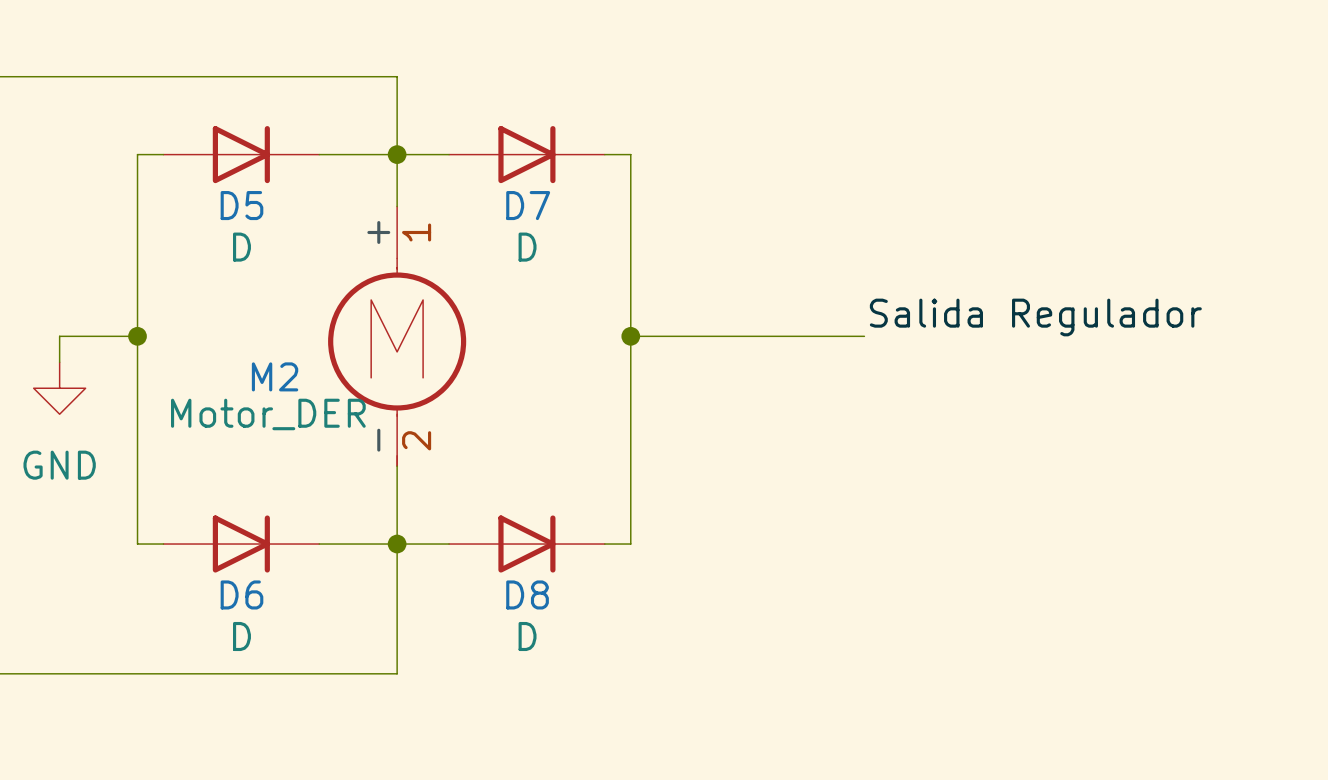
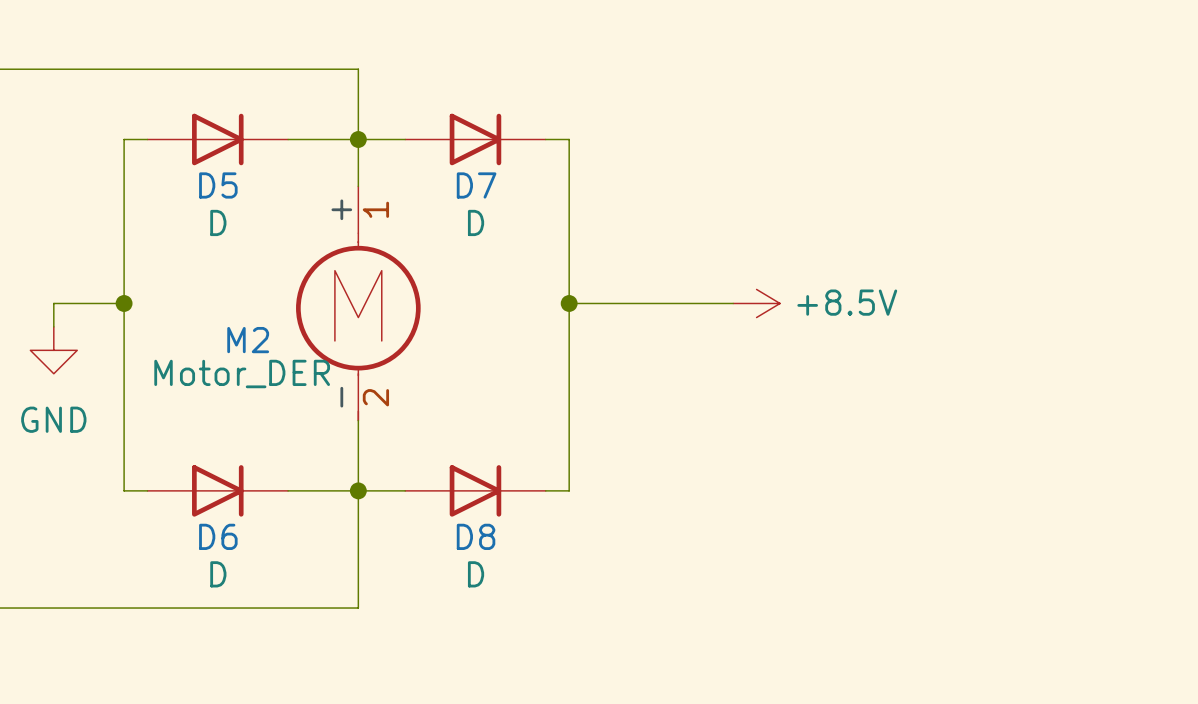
label: Salida Regulador (1035, 317) -> none
power symbol: none -> +8.5V (756, 303)

